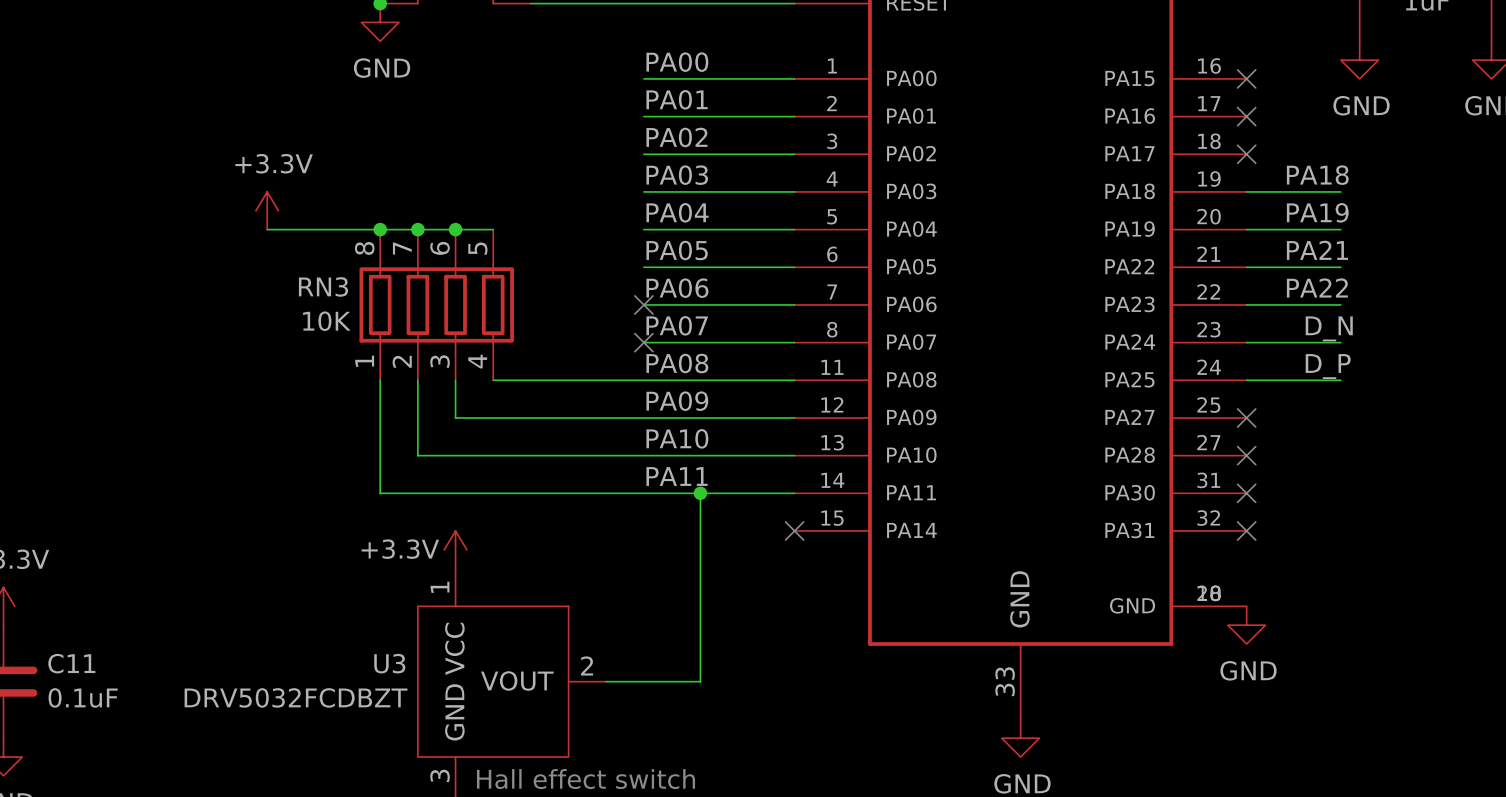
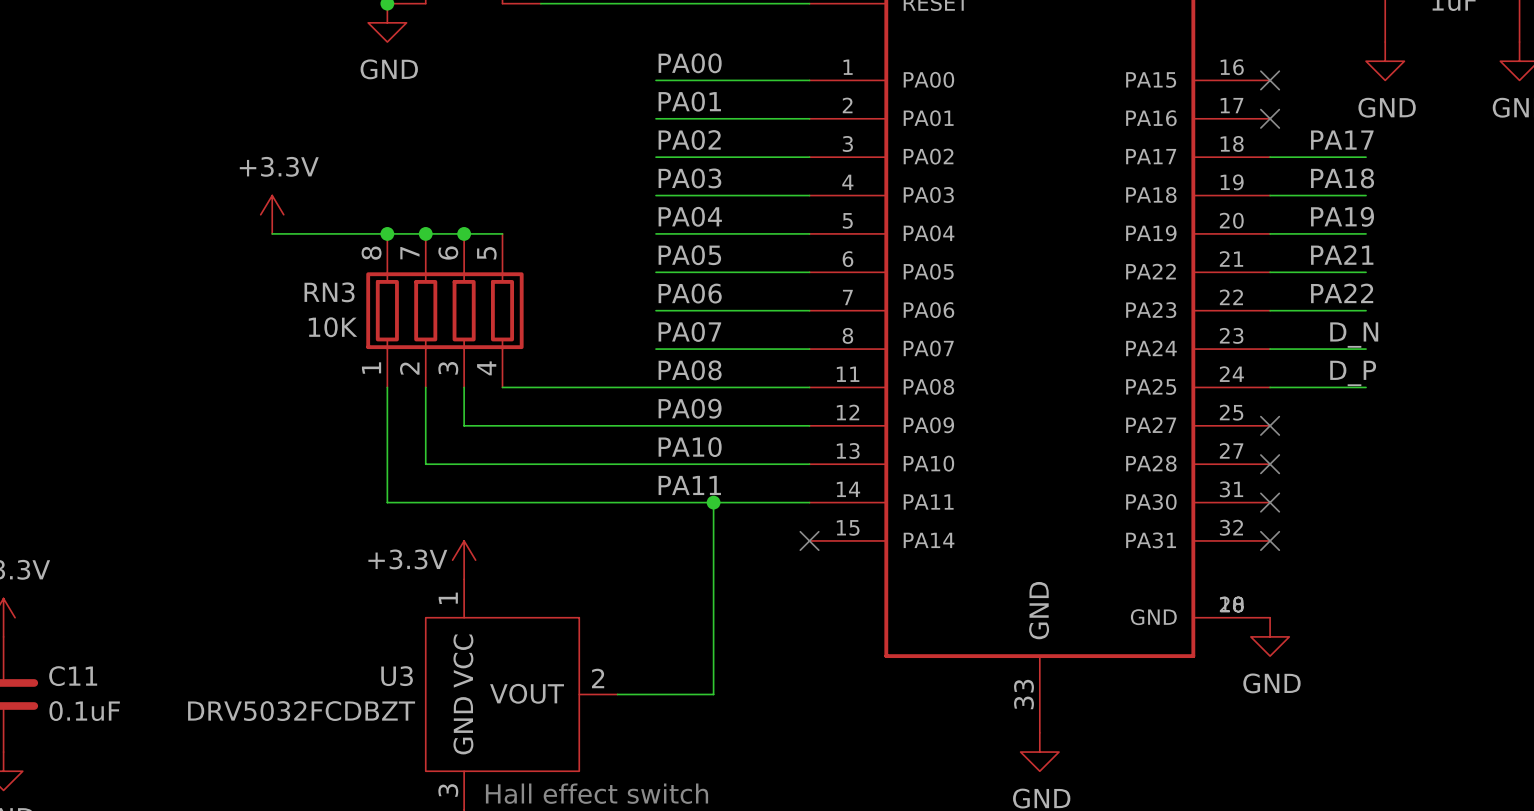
label: none -> PA17 (1342, 140)
wire: none -> (1270, 157) (1366, 157)
no-connect mark: (1246, 154) -> none
no-connect mark: (643, 304) -> none
no-connect mark: (643, 342) -> none

